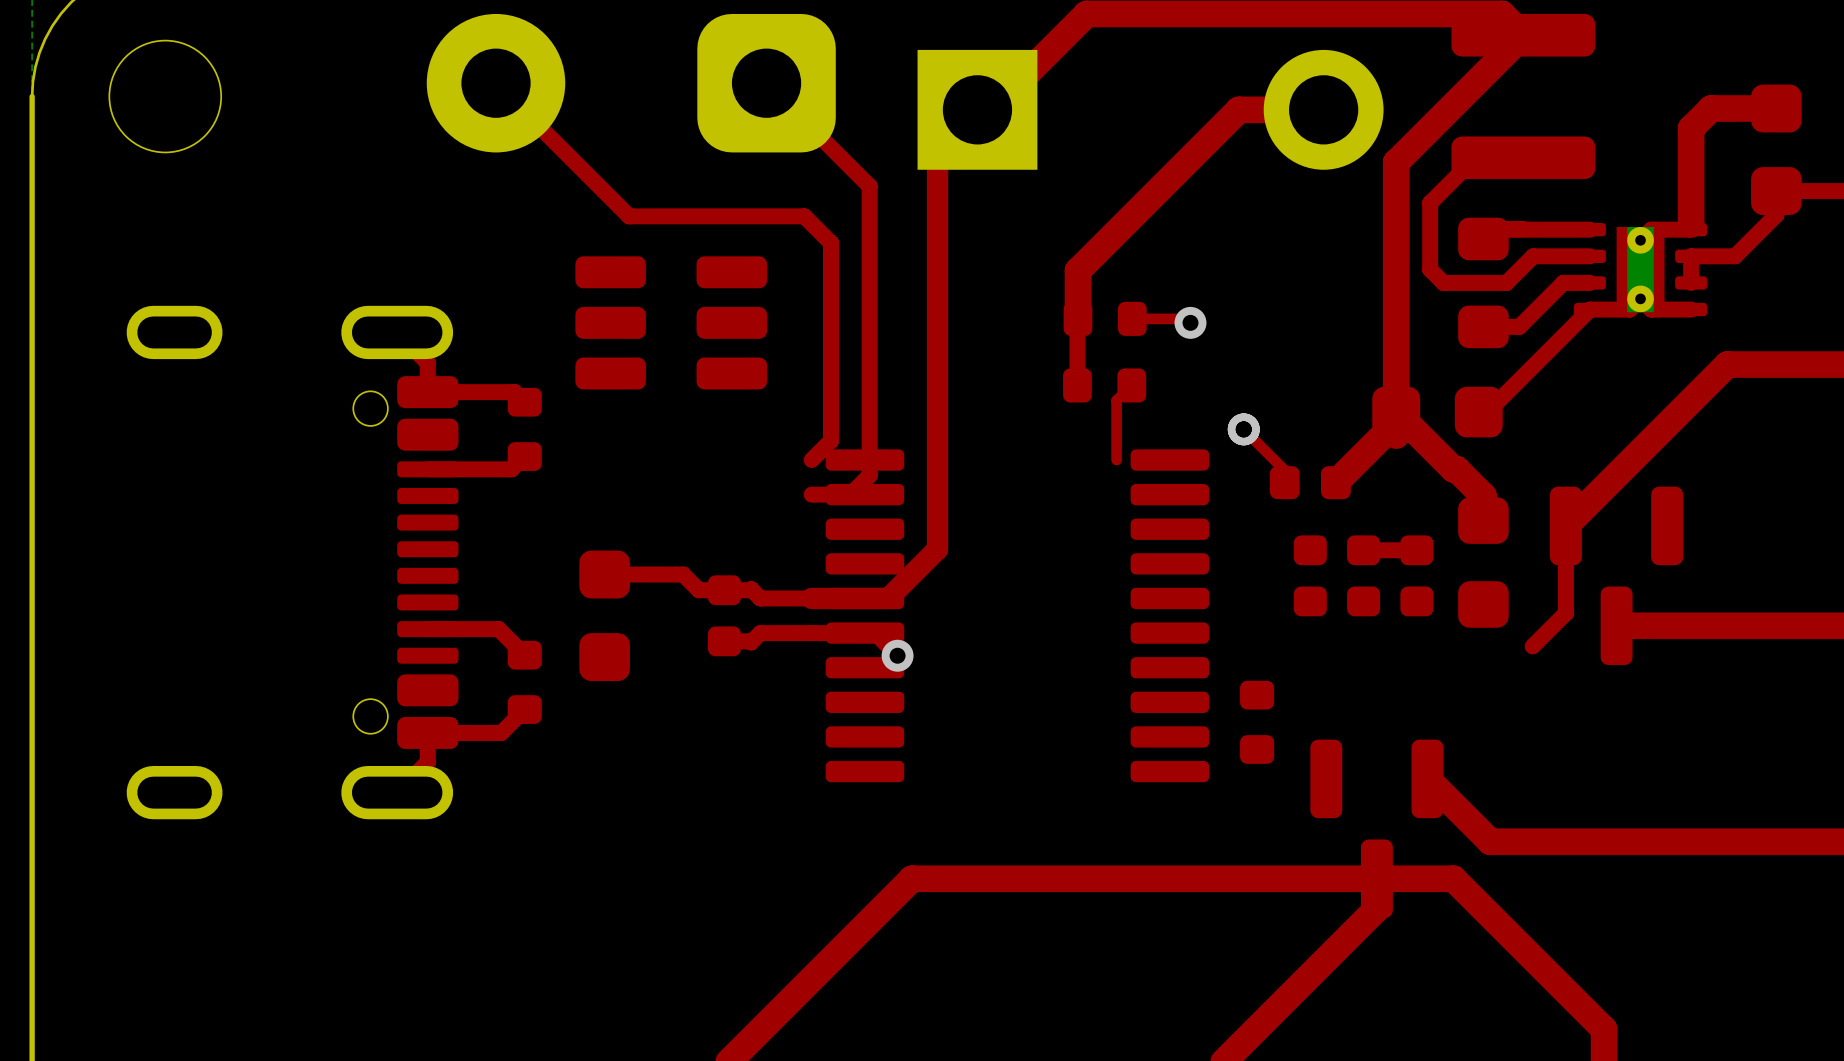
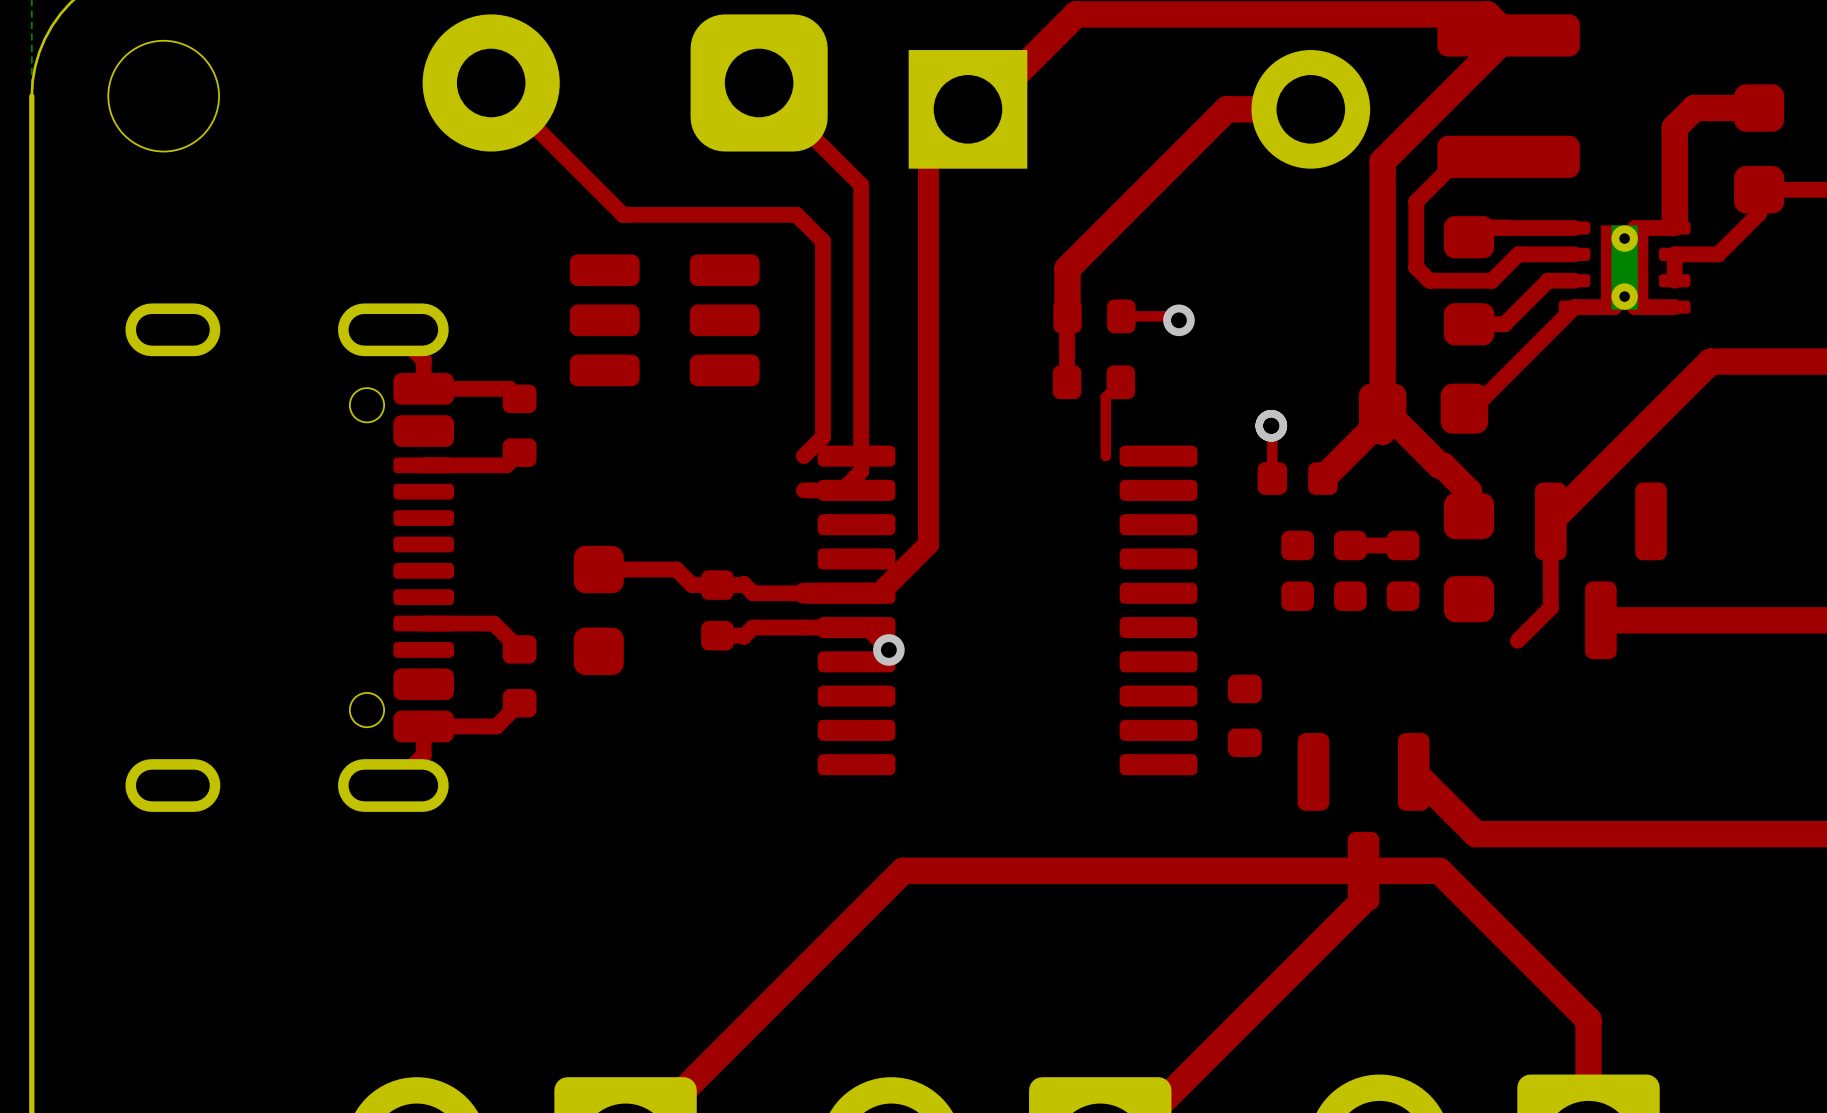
top track: (1243, 429) (1284, 470) -> (1271, 425) (1272, 466)
via position: (1243, 429) -> (1271, 425)

